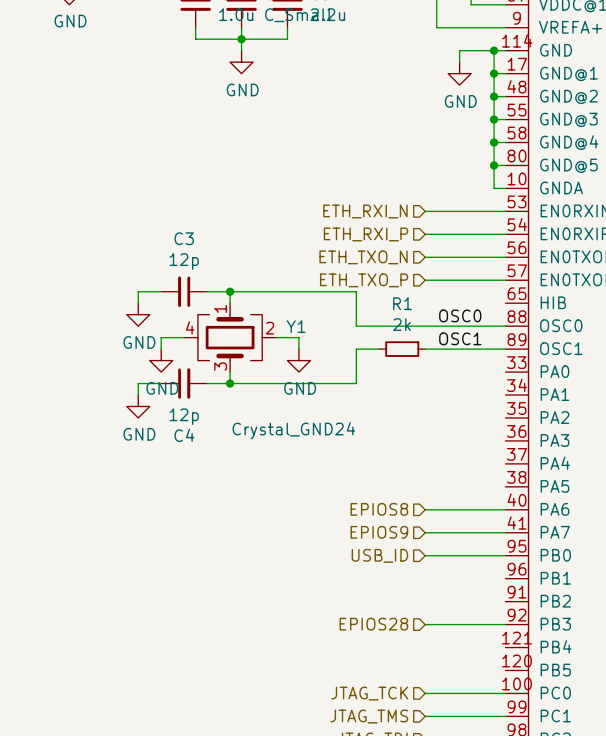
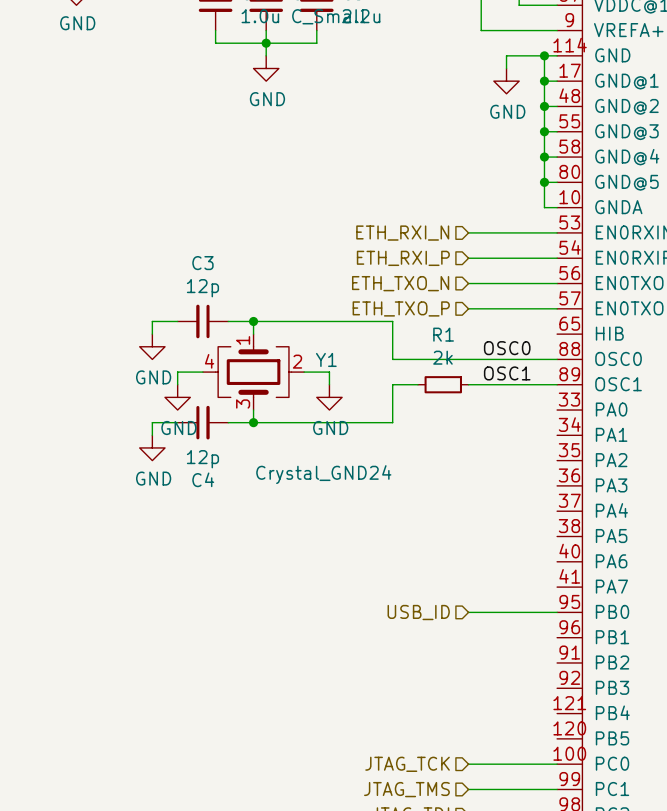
hierarchical label: EPIOS8 (379, 509) -> none
wire: (425, 509) (505, 509) -> none
hierarchical label: EPIOS9 (379, 532) -> none
wire: (425, 532) (505, 532) -> none
hierarchical label: EPIOS28 (373, 624) -> none
wire: (425, 624) (505, 624) -> none

